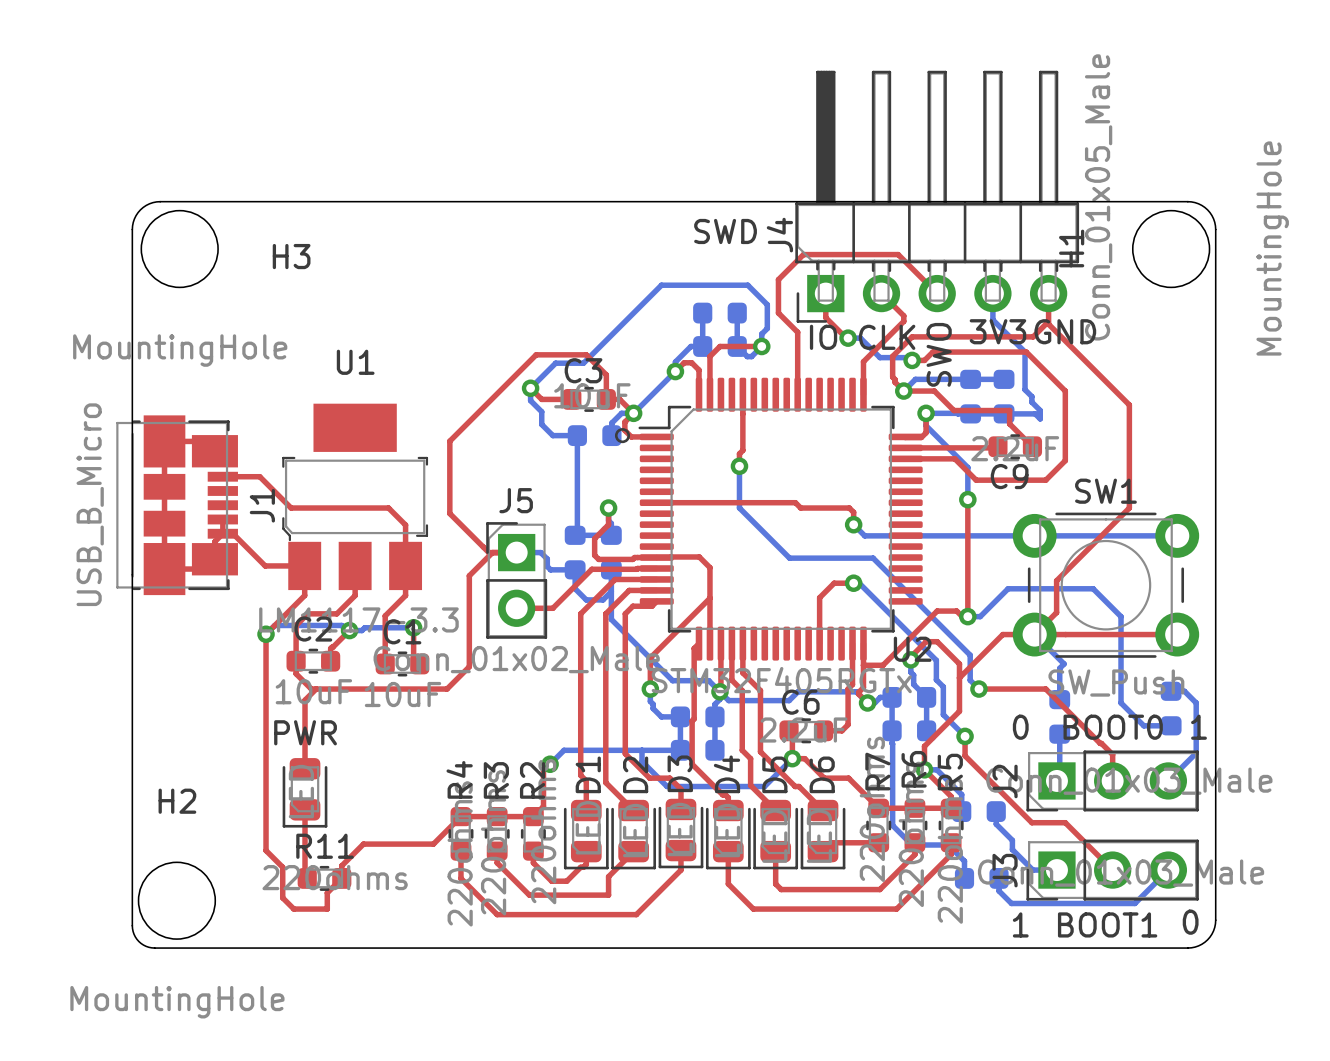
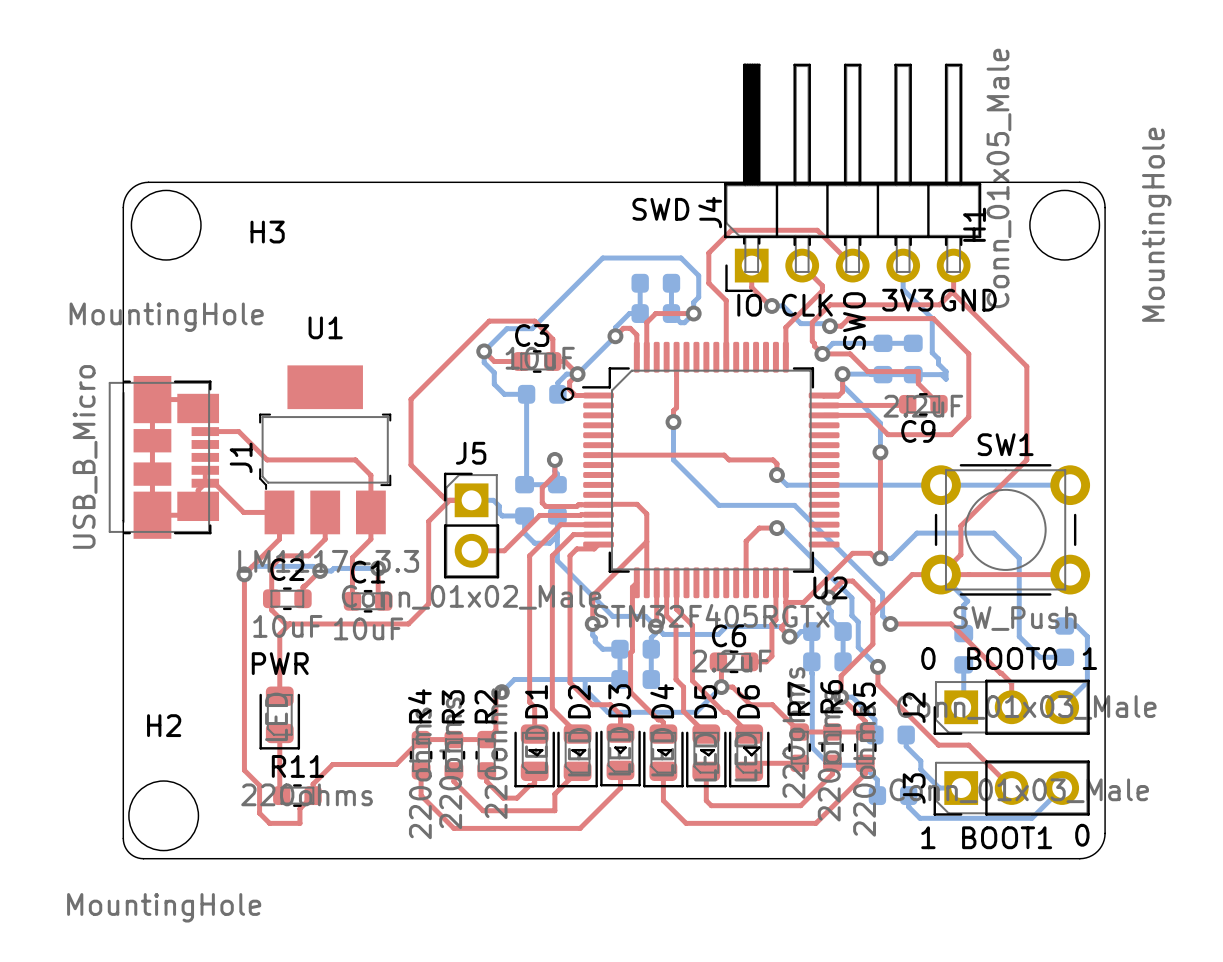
line: none -> (615, 747) (620, 752) (625, 747) (615, 747)
line: none -> (744, 747) (759, 747) (751, 755) (744, 747)
line: none -> (529, 750) (537, 755) (542, 750) (529, 750)
line: none -> (572, 750) (585, 750) (580, 755) (572, 750)
line: none -> (658, 750) (670, 750) (665, 755) (658, 750)
line: none -> (701, 750) (713, 750) (708, 755) (701, 750)

